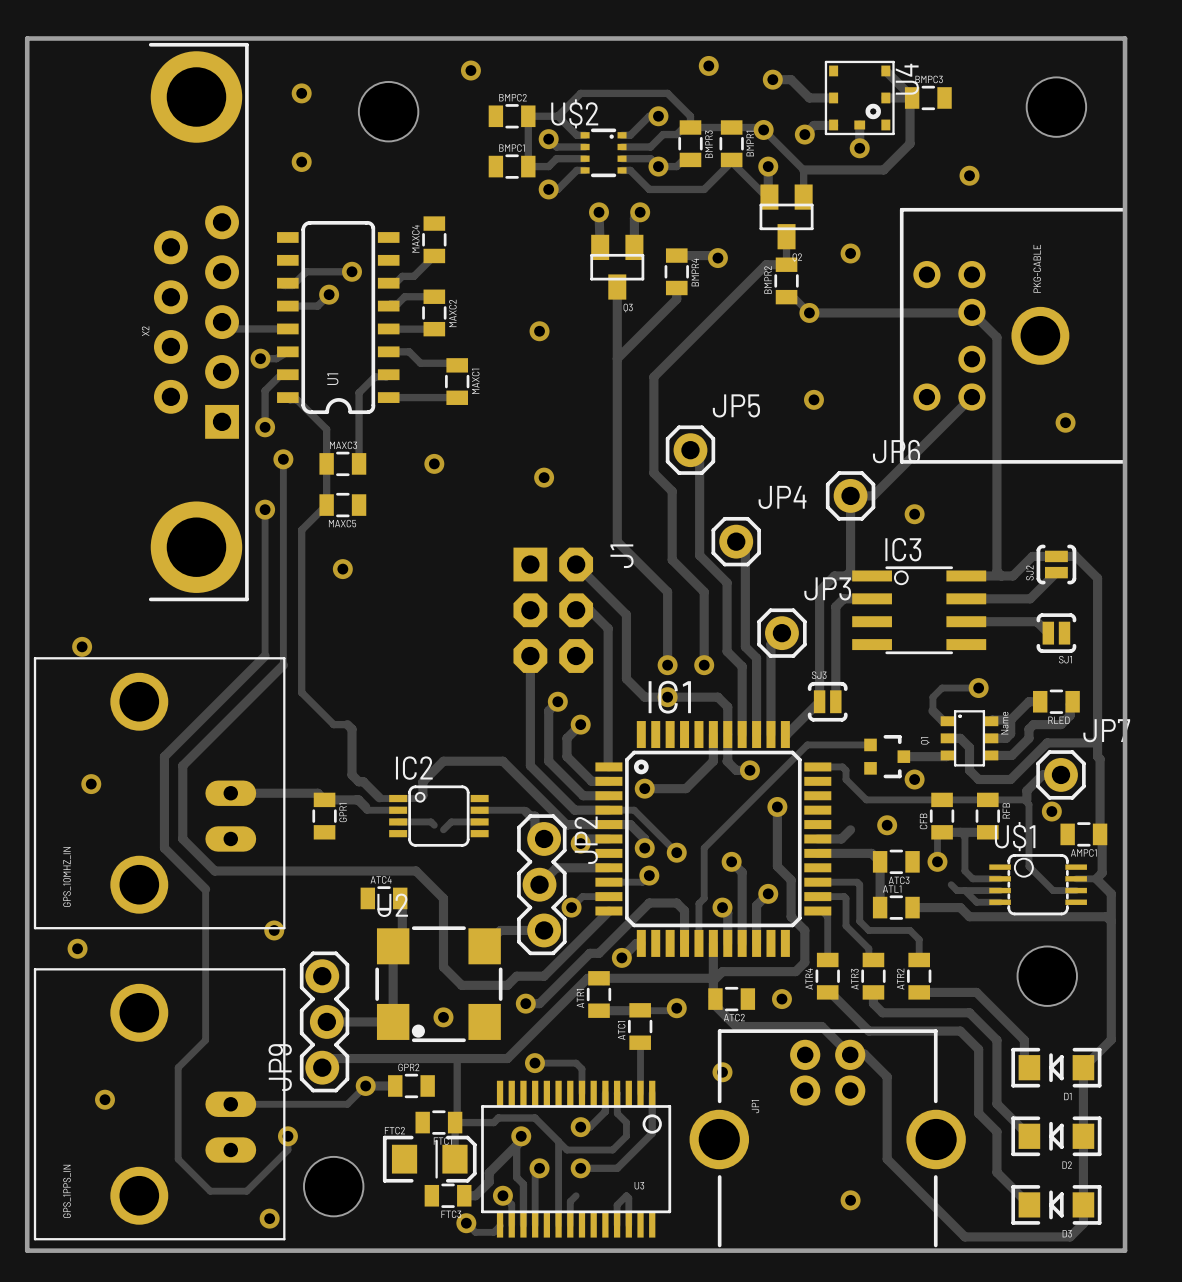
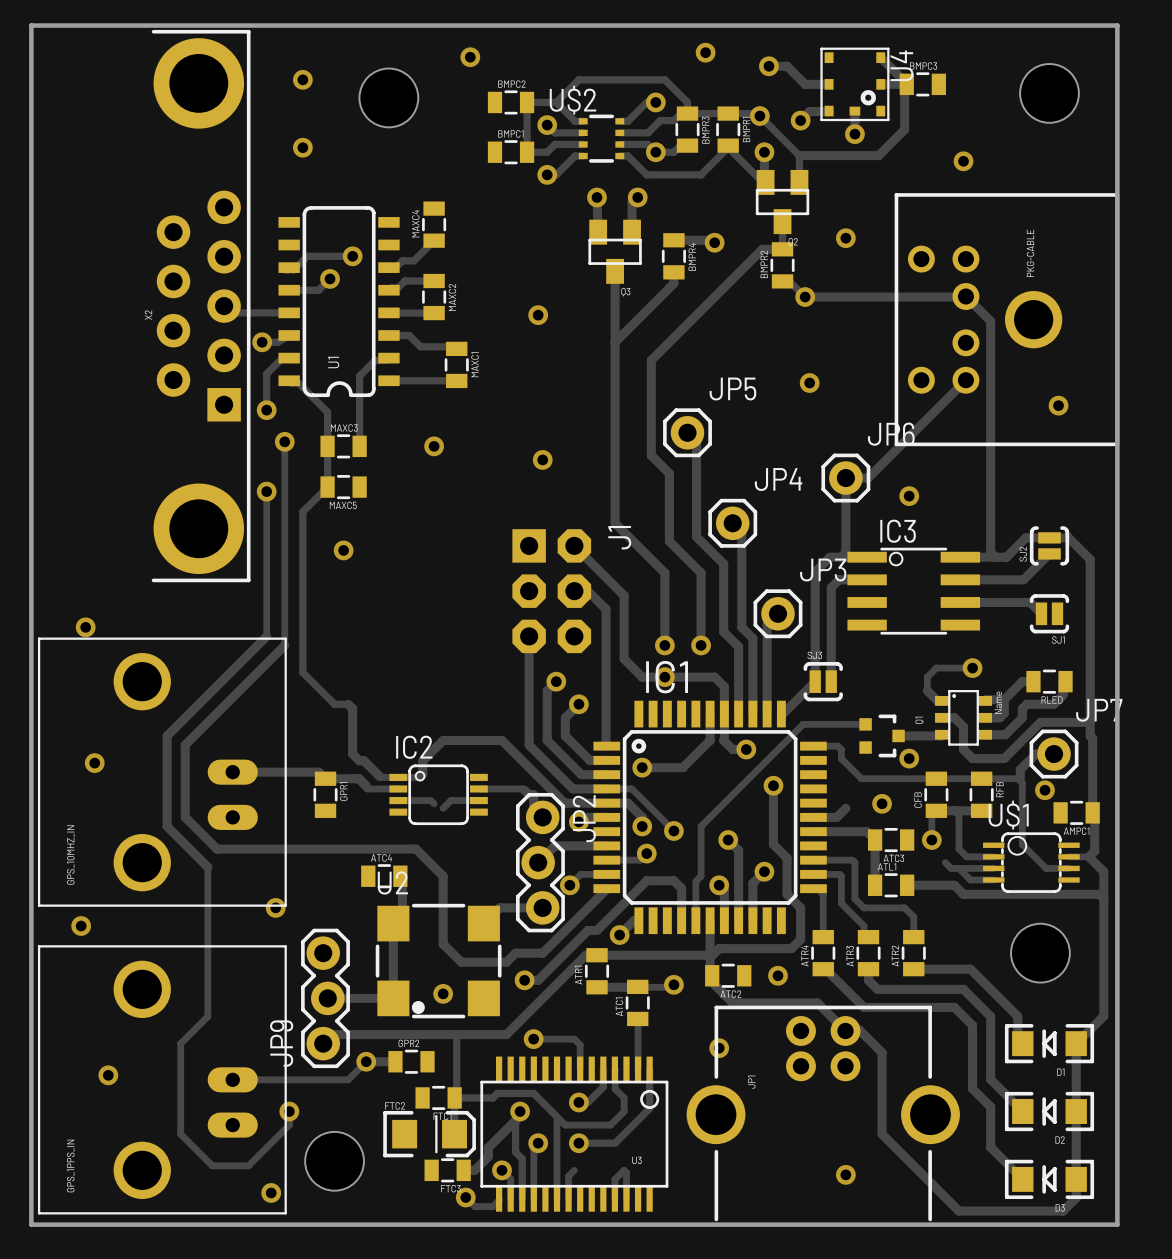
U$2 footprint: [580, 128, 627, 178] -> [578, 114, 625, 163]

